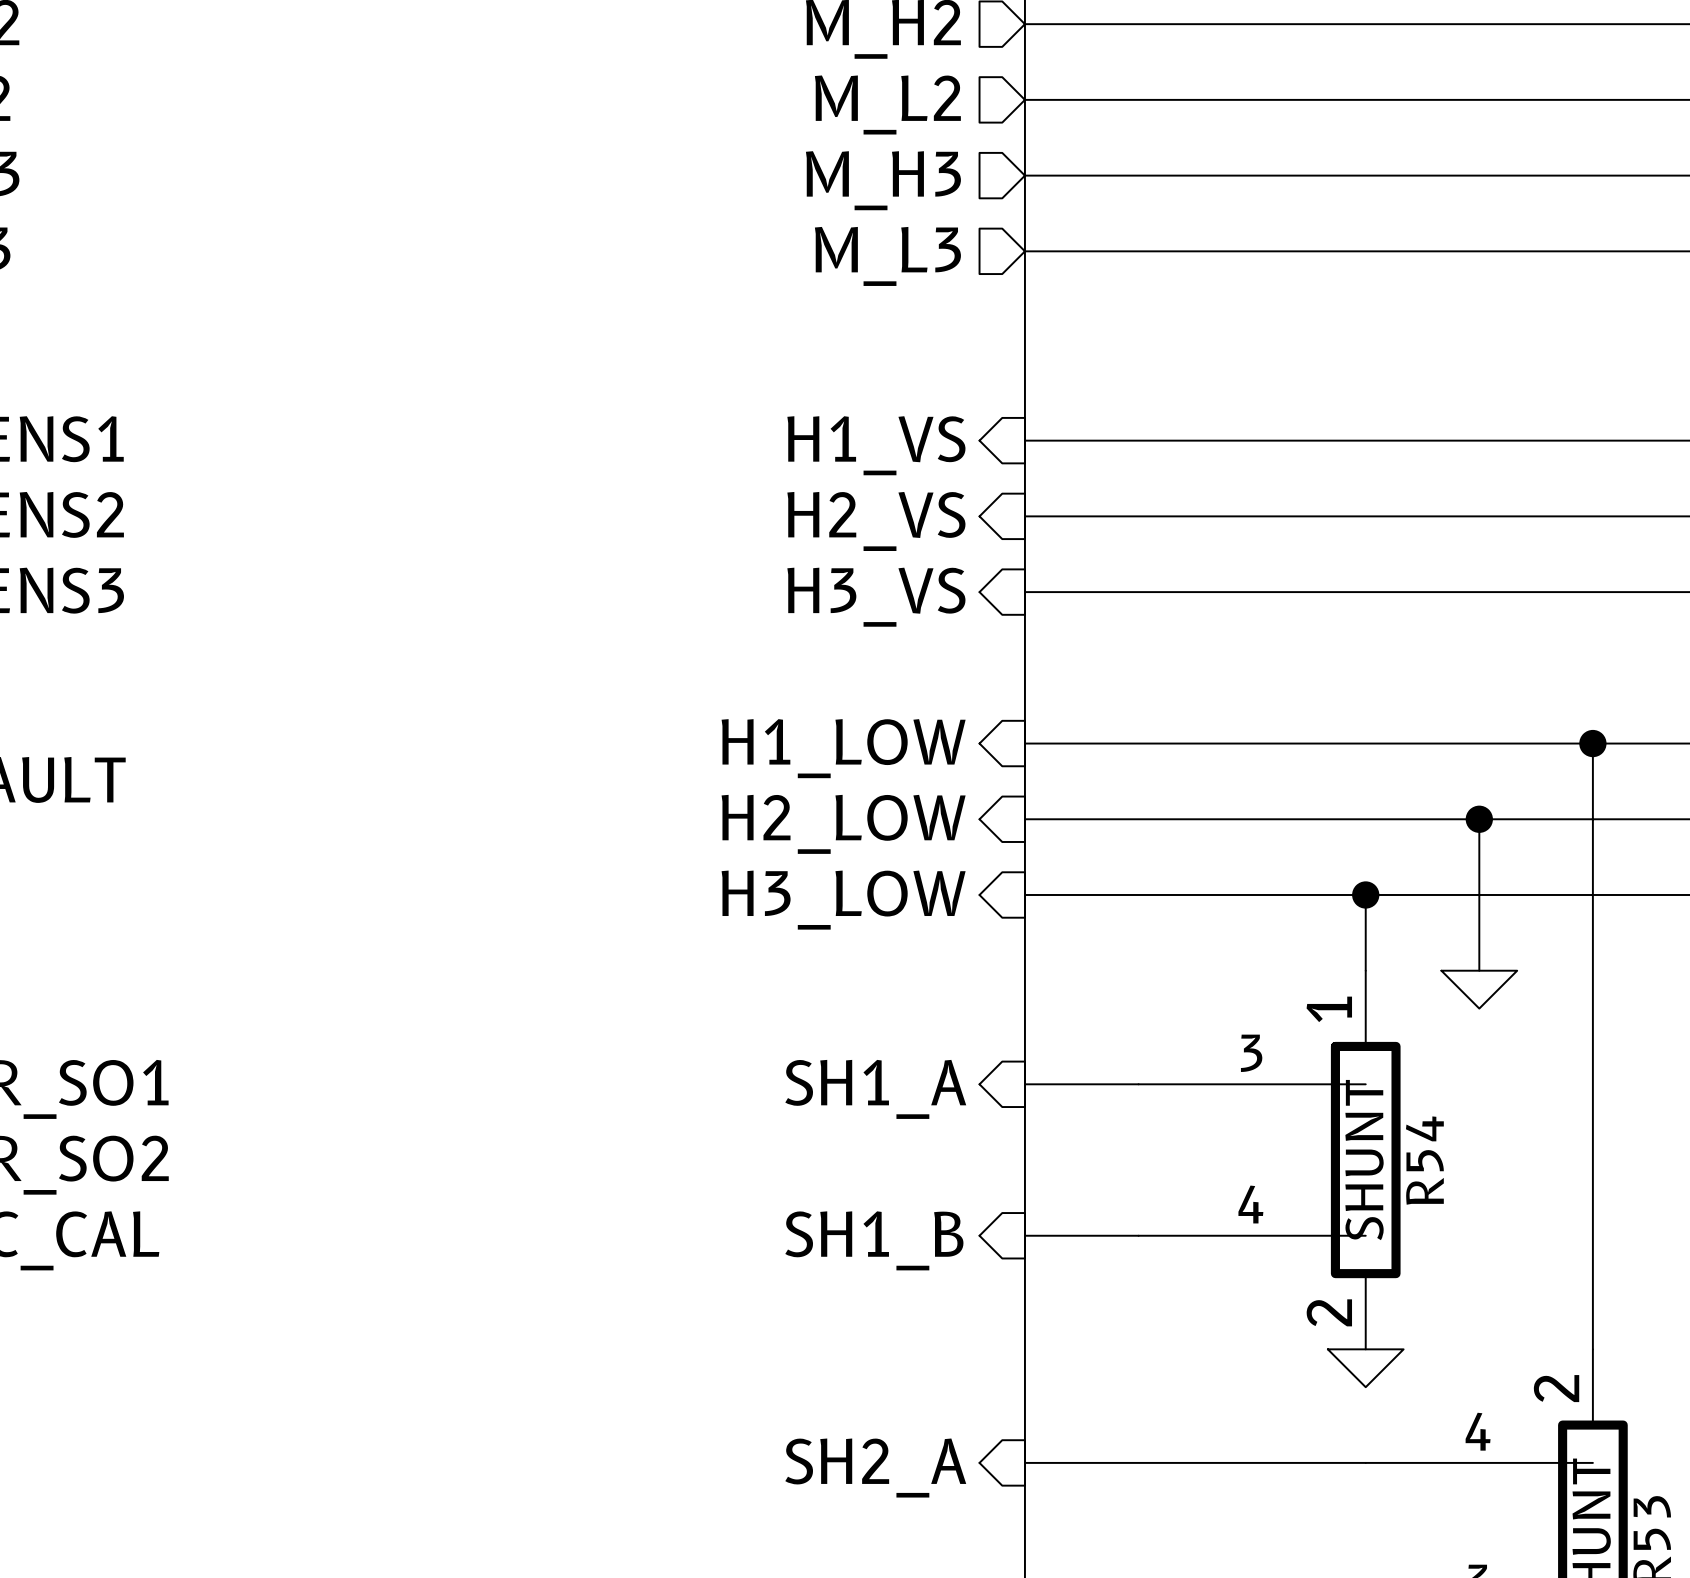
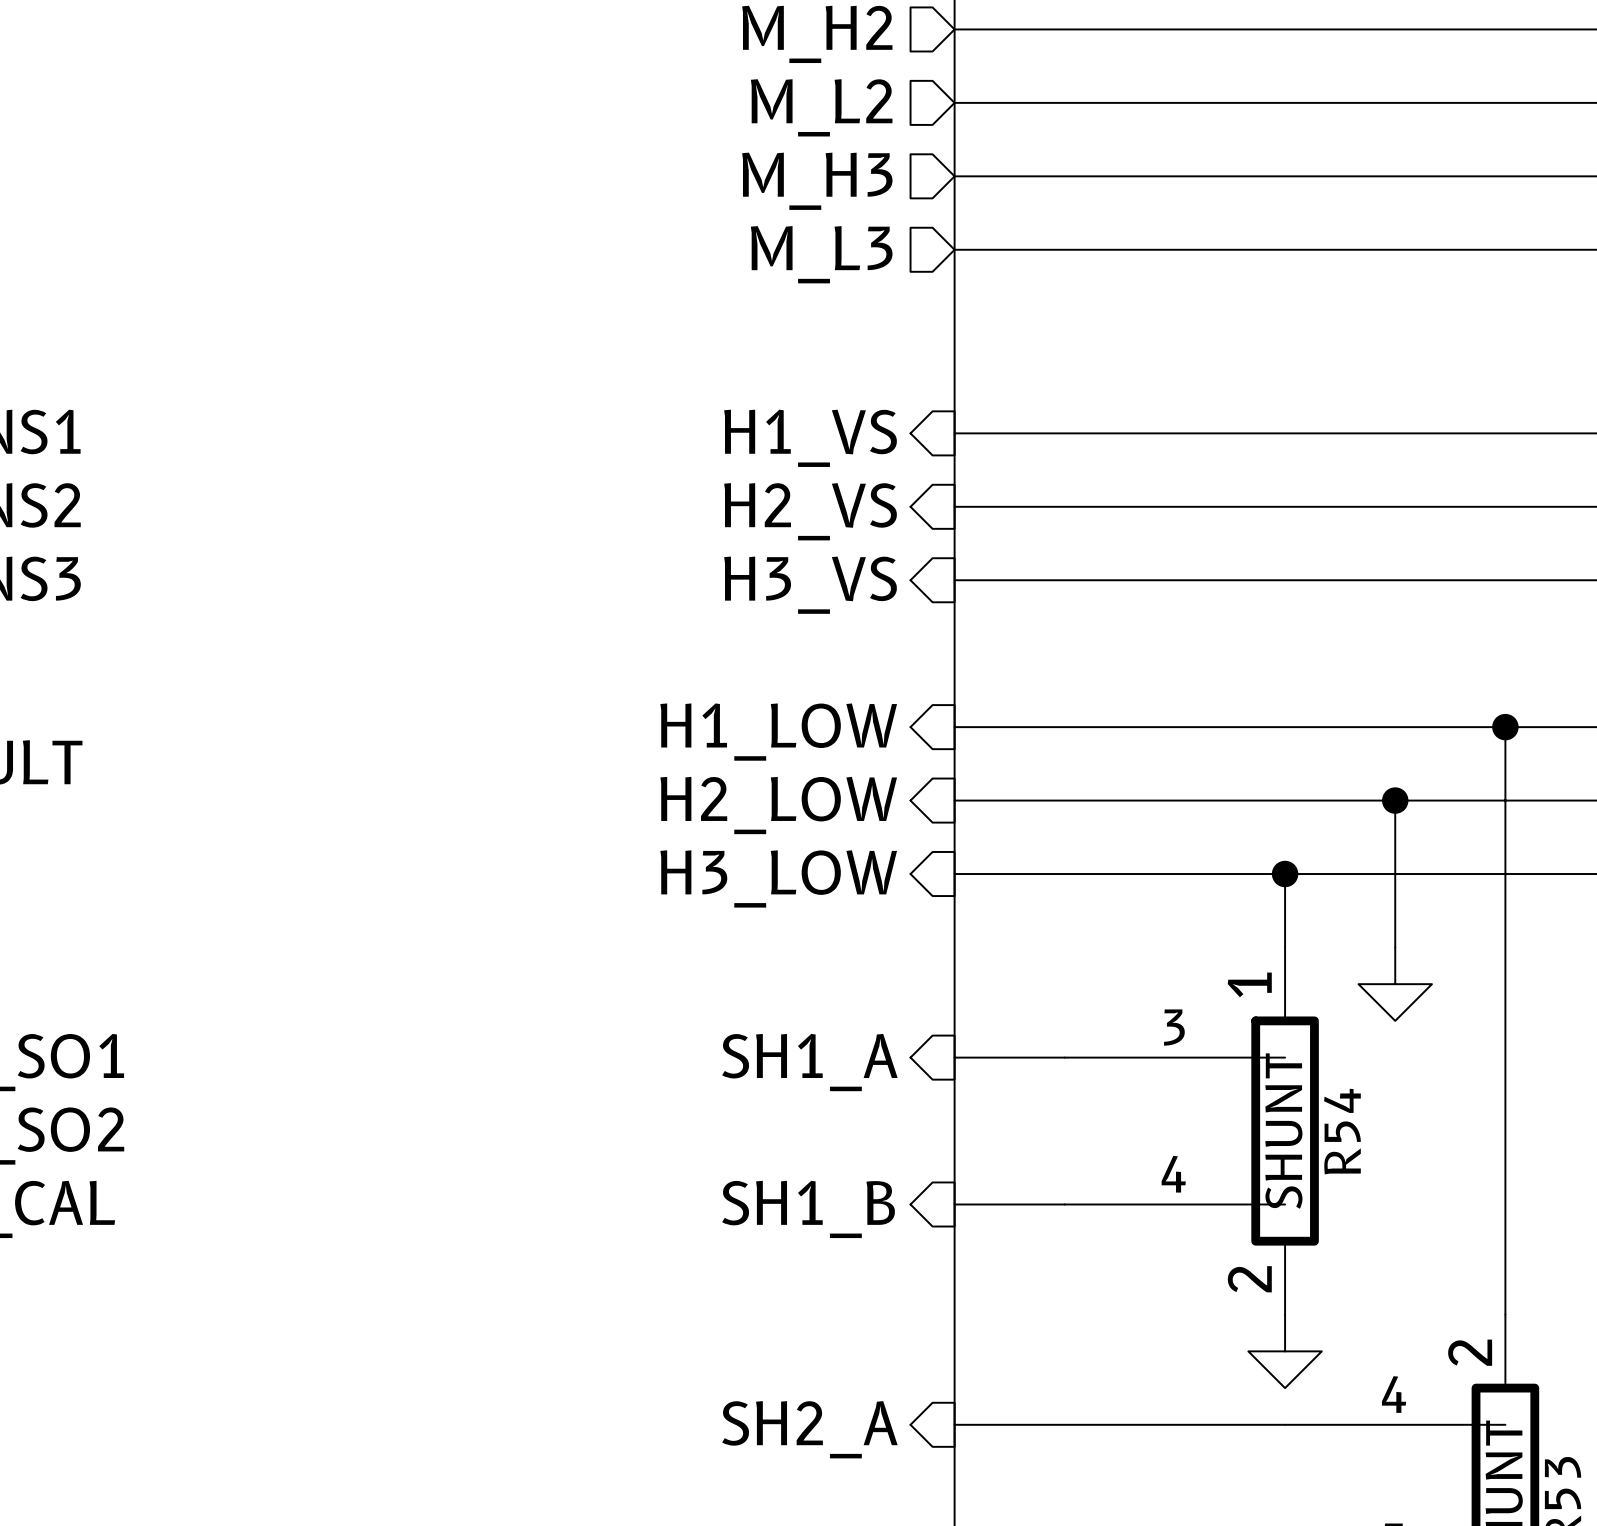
power symbol shape: [1441, 970, 1518, 1009] -> [1358, 947, 1432, 1021]
power symbol shape: [1327, 1349, 1404, 1388] -> [1248, 1314, 1322, 1389]

